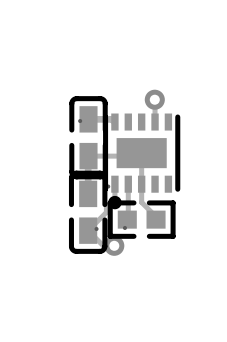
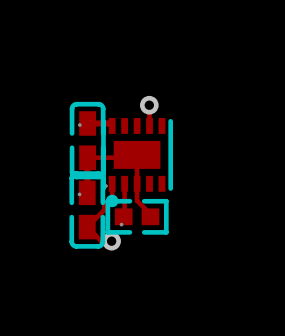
part rotation: 0° (88, 212) -> 180° (87, 209)

